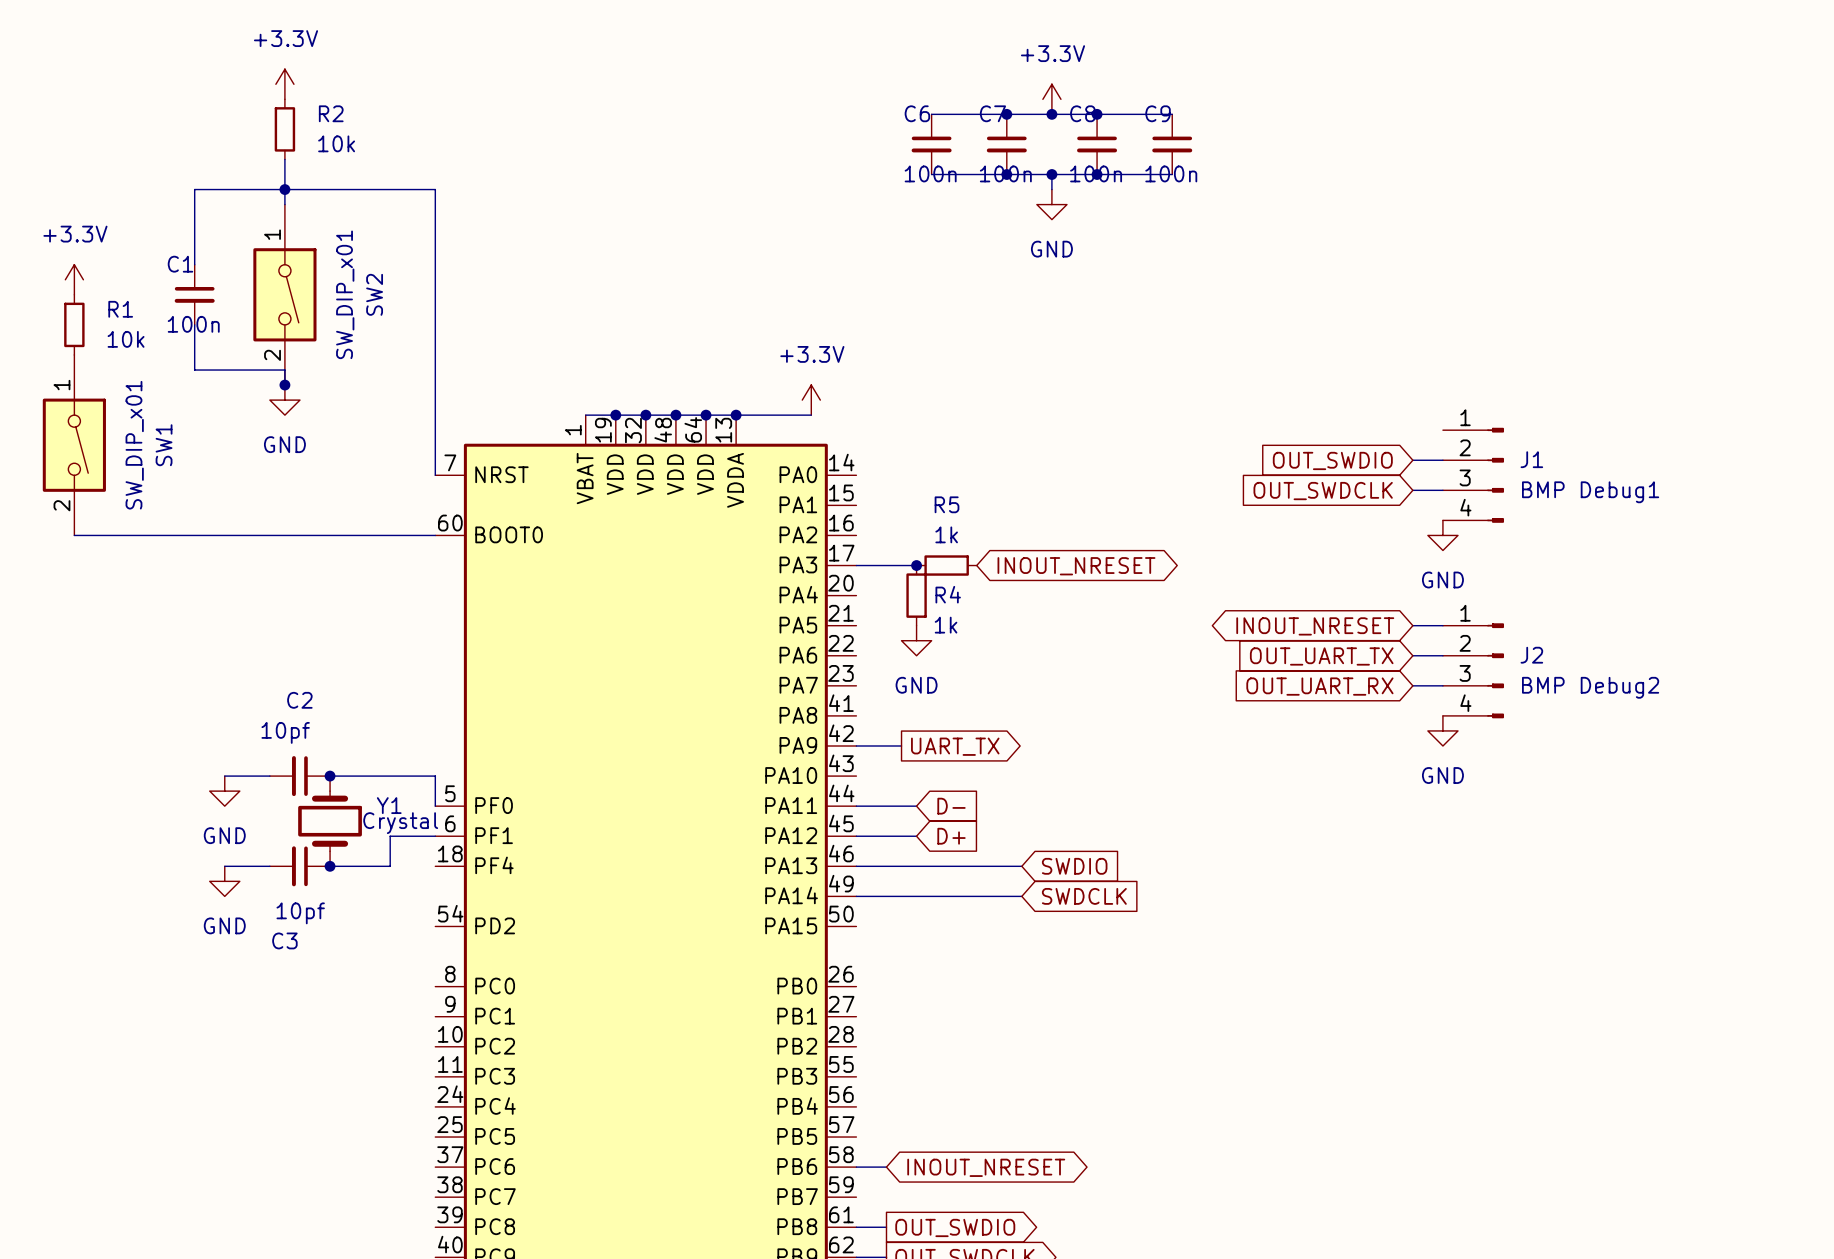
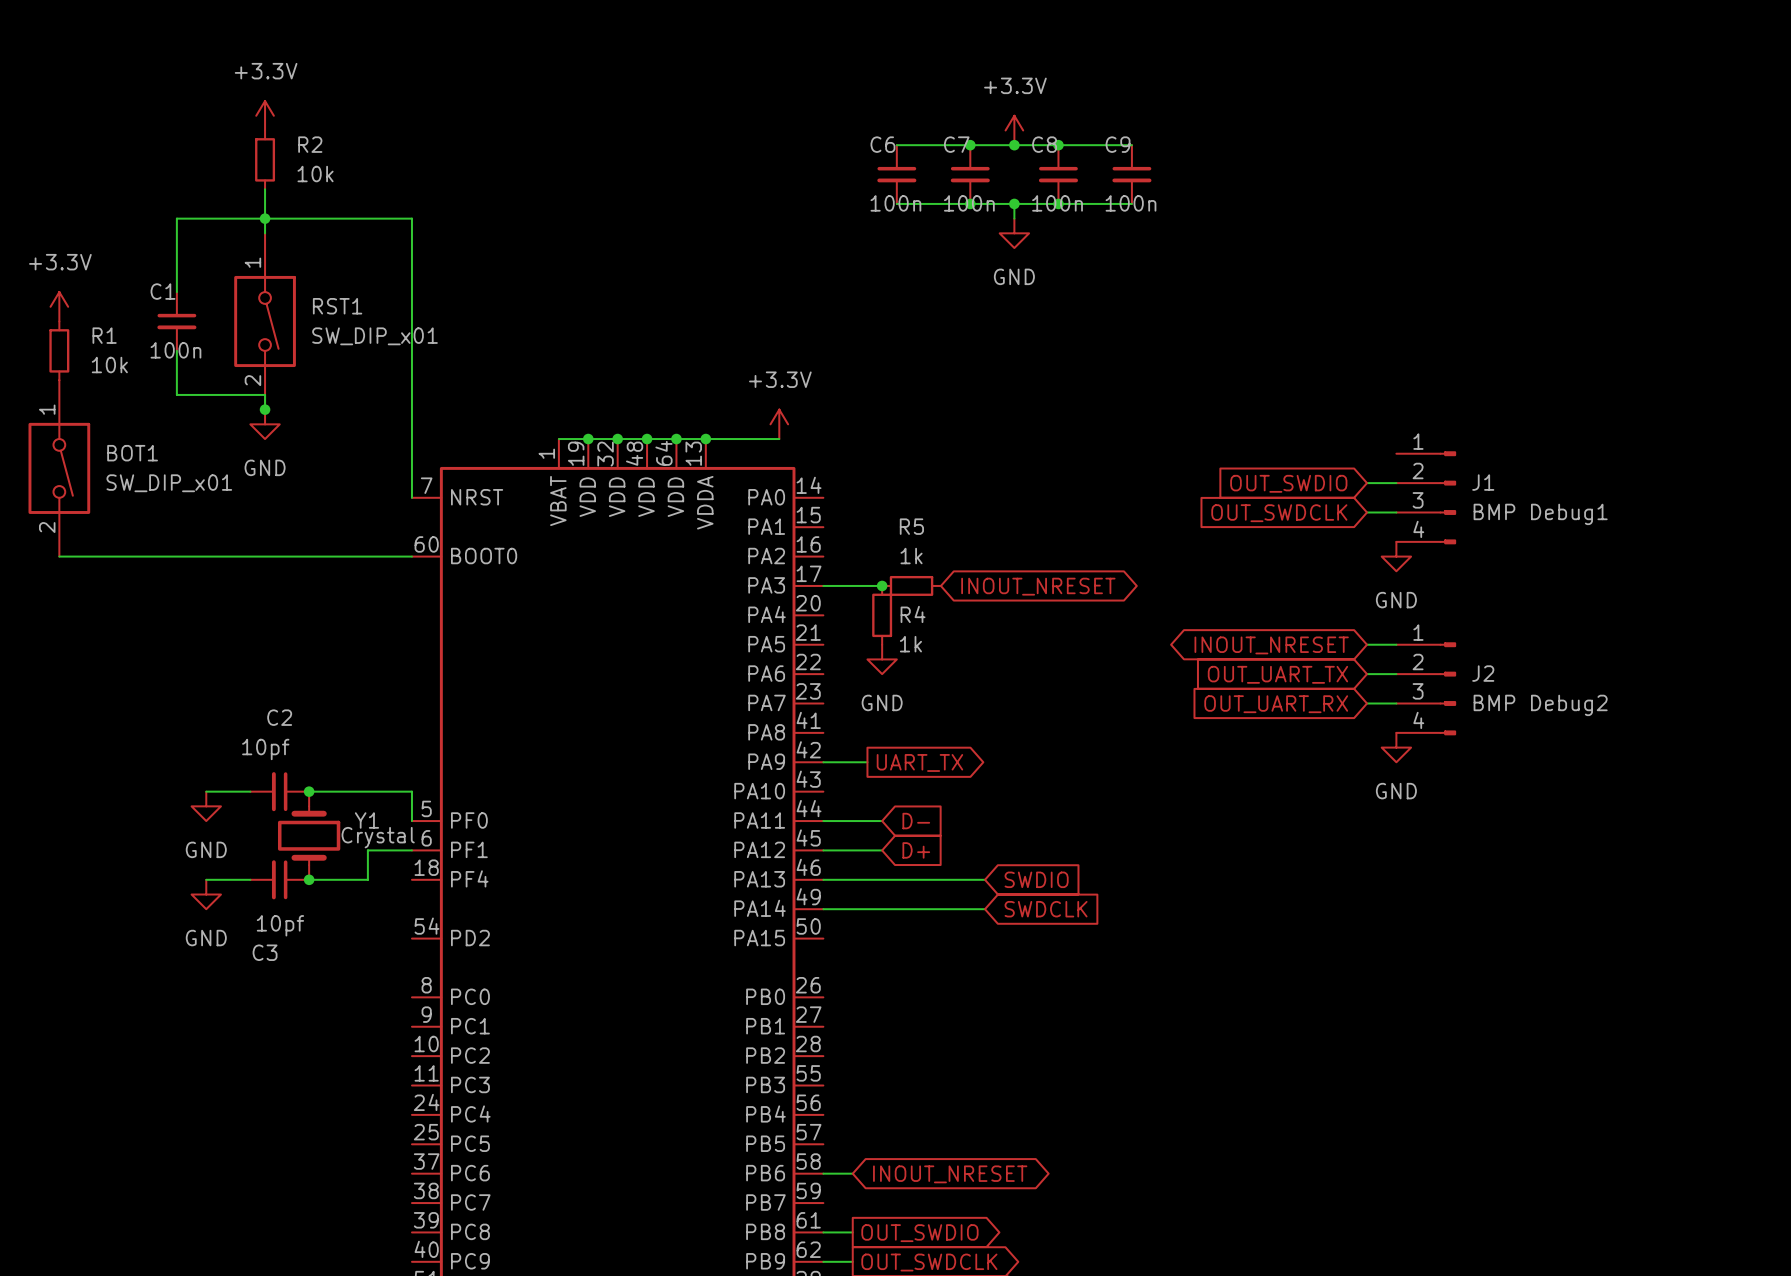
SW2 value rotation: 0° (345, 294) -> 90° clockwise (375, 336)
SW2 name: SW2 (374, 294) -> RST1 (337, 306)
SW1 value rotation: 0° (134, 445) -> 90° clockwise (169, 483)
SW1 name: SW1 (164, 445) -> BOT1 (132, 453)

